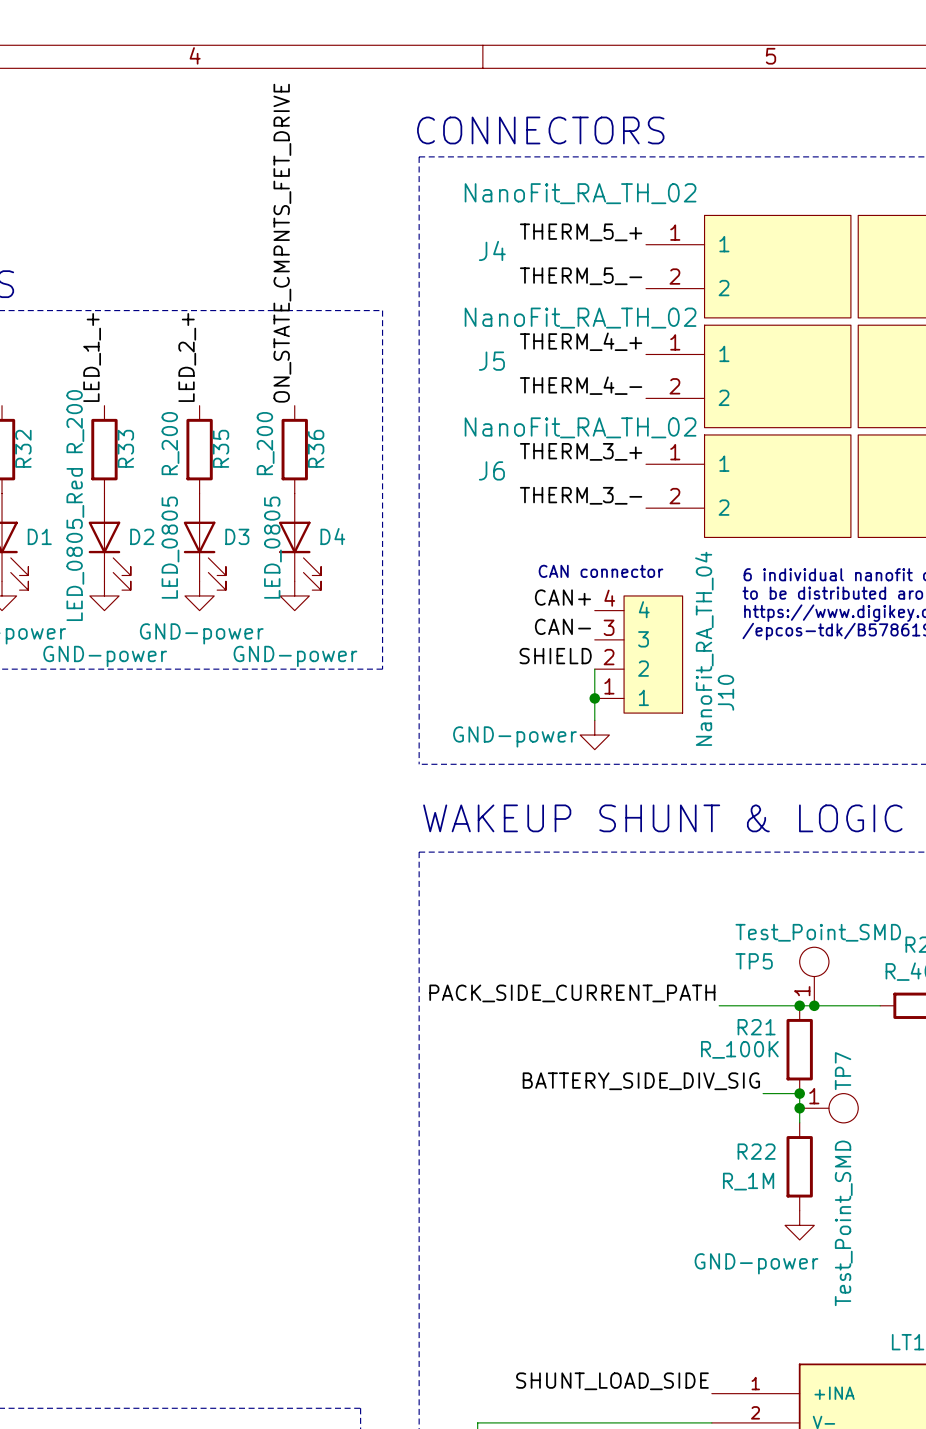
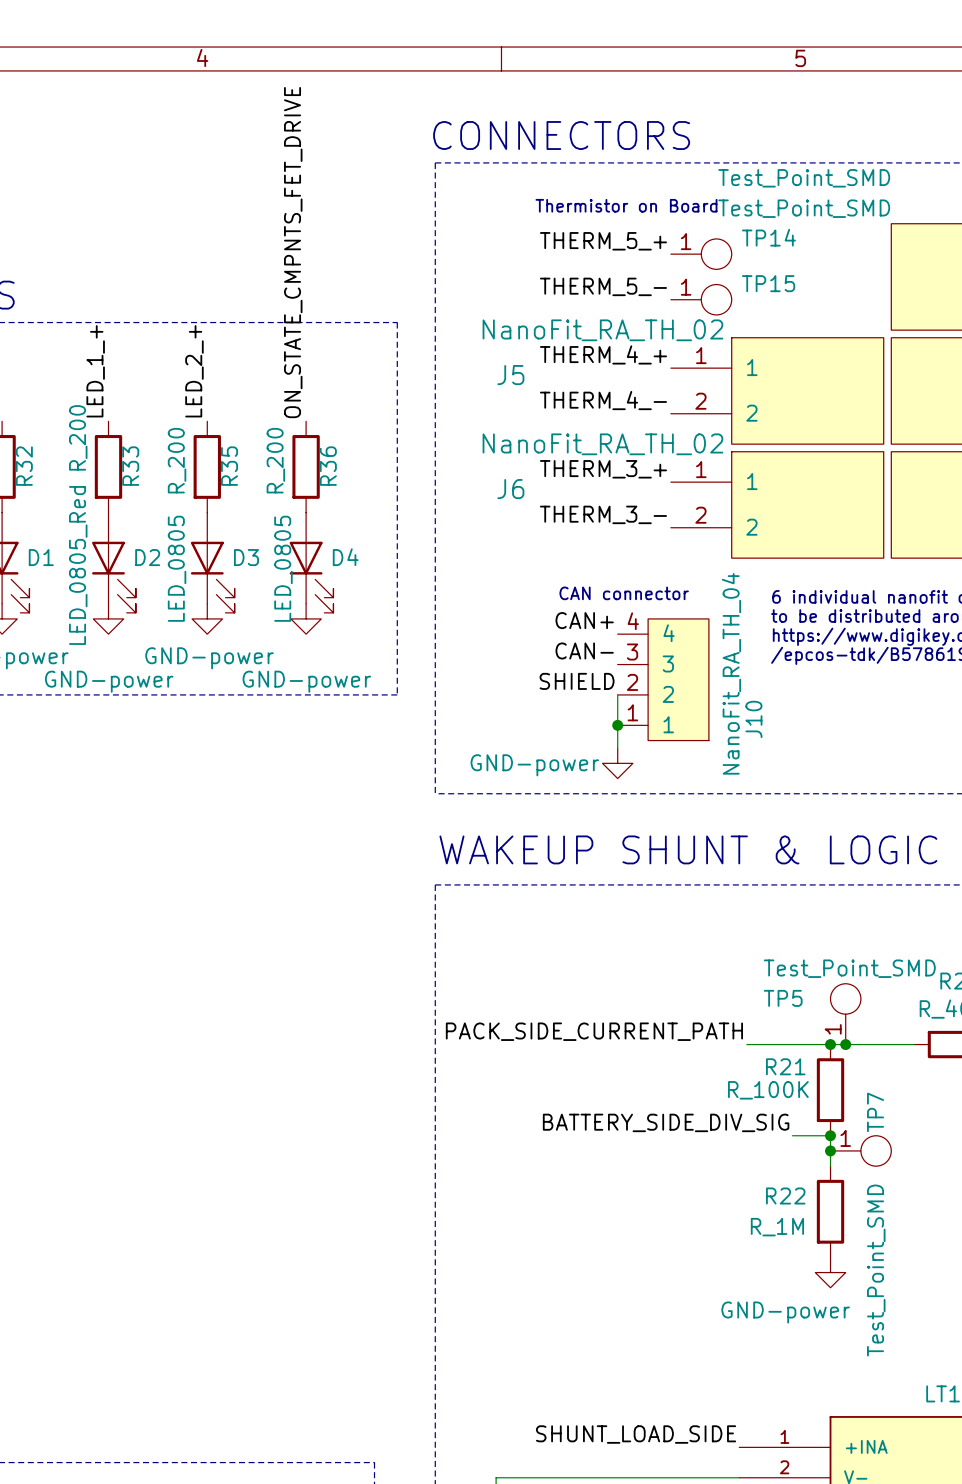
text: none -> Thermistor on Board (626, 205)
TP14: none -> Test_Point_SMD (701, 254)
J4: NanoFit_RA_TH_02 (748, 266) -> none
TP15: none -> Test_Point_SMD (701, 299)

